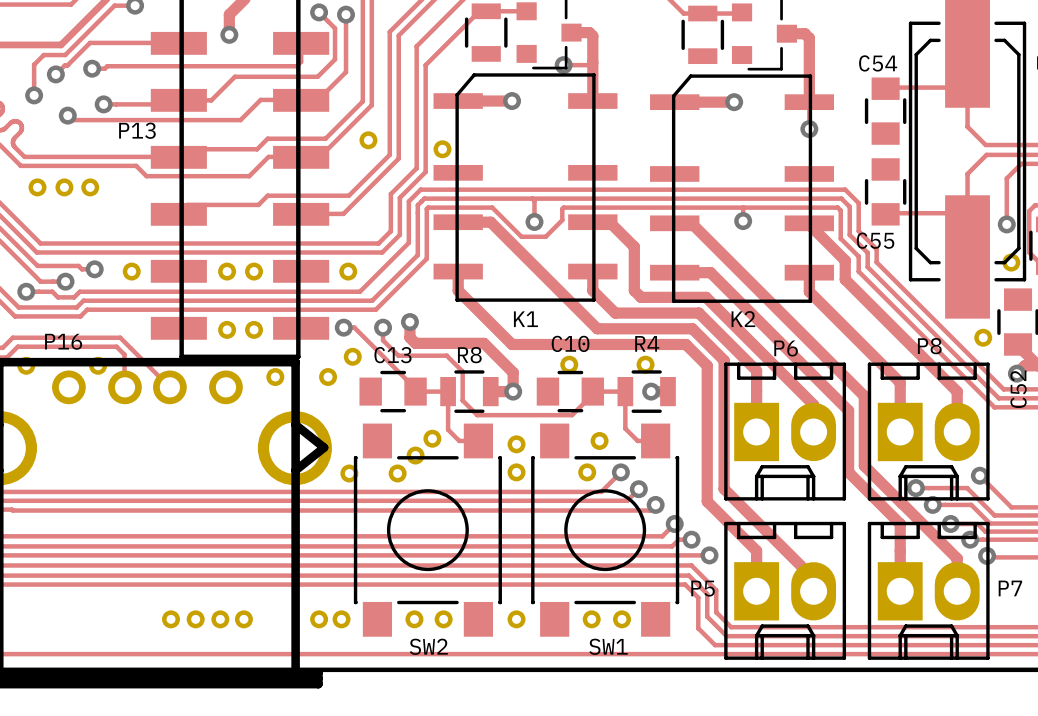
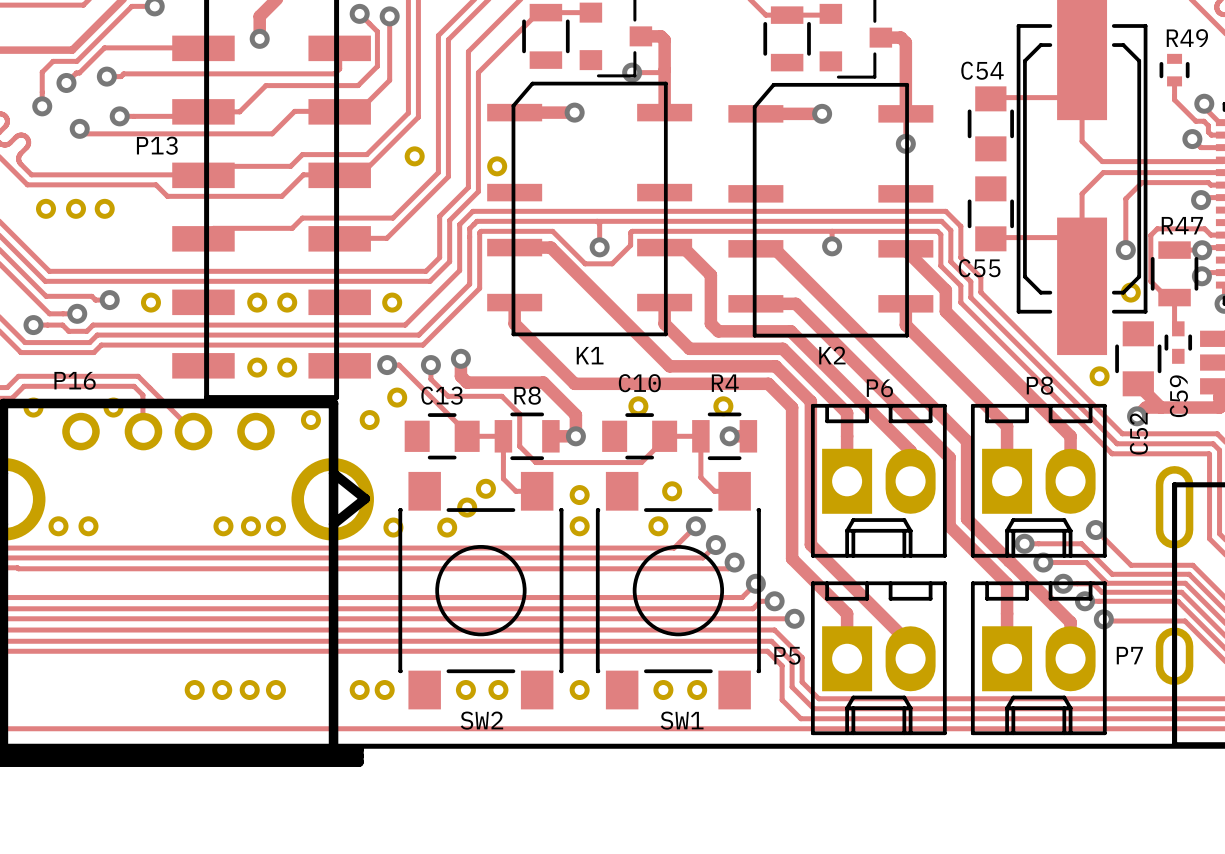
part: none -> (58, 526)
part: none -> (88, 526)
part: none -> (223, 526)
part: none -> (250, 526)
part: none -> (275, 526)

